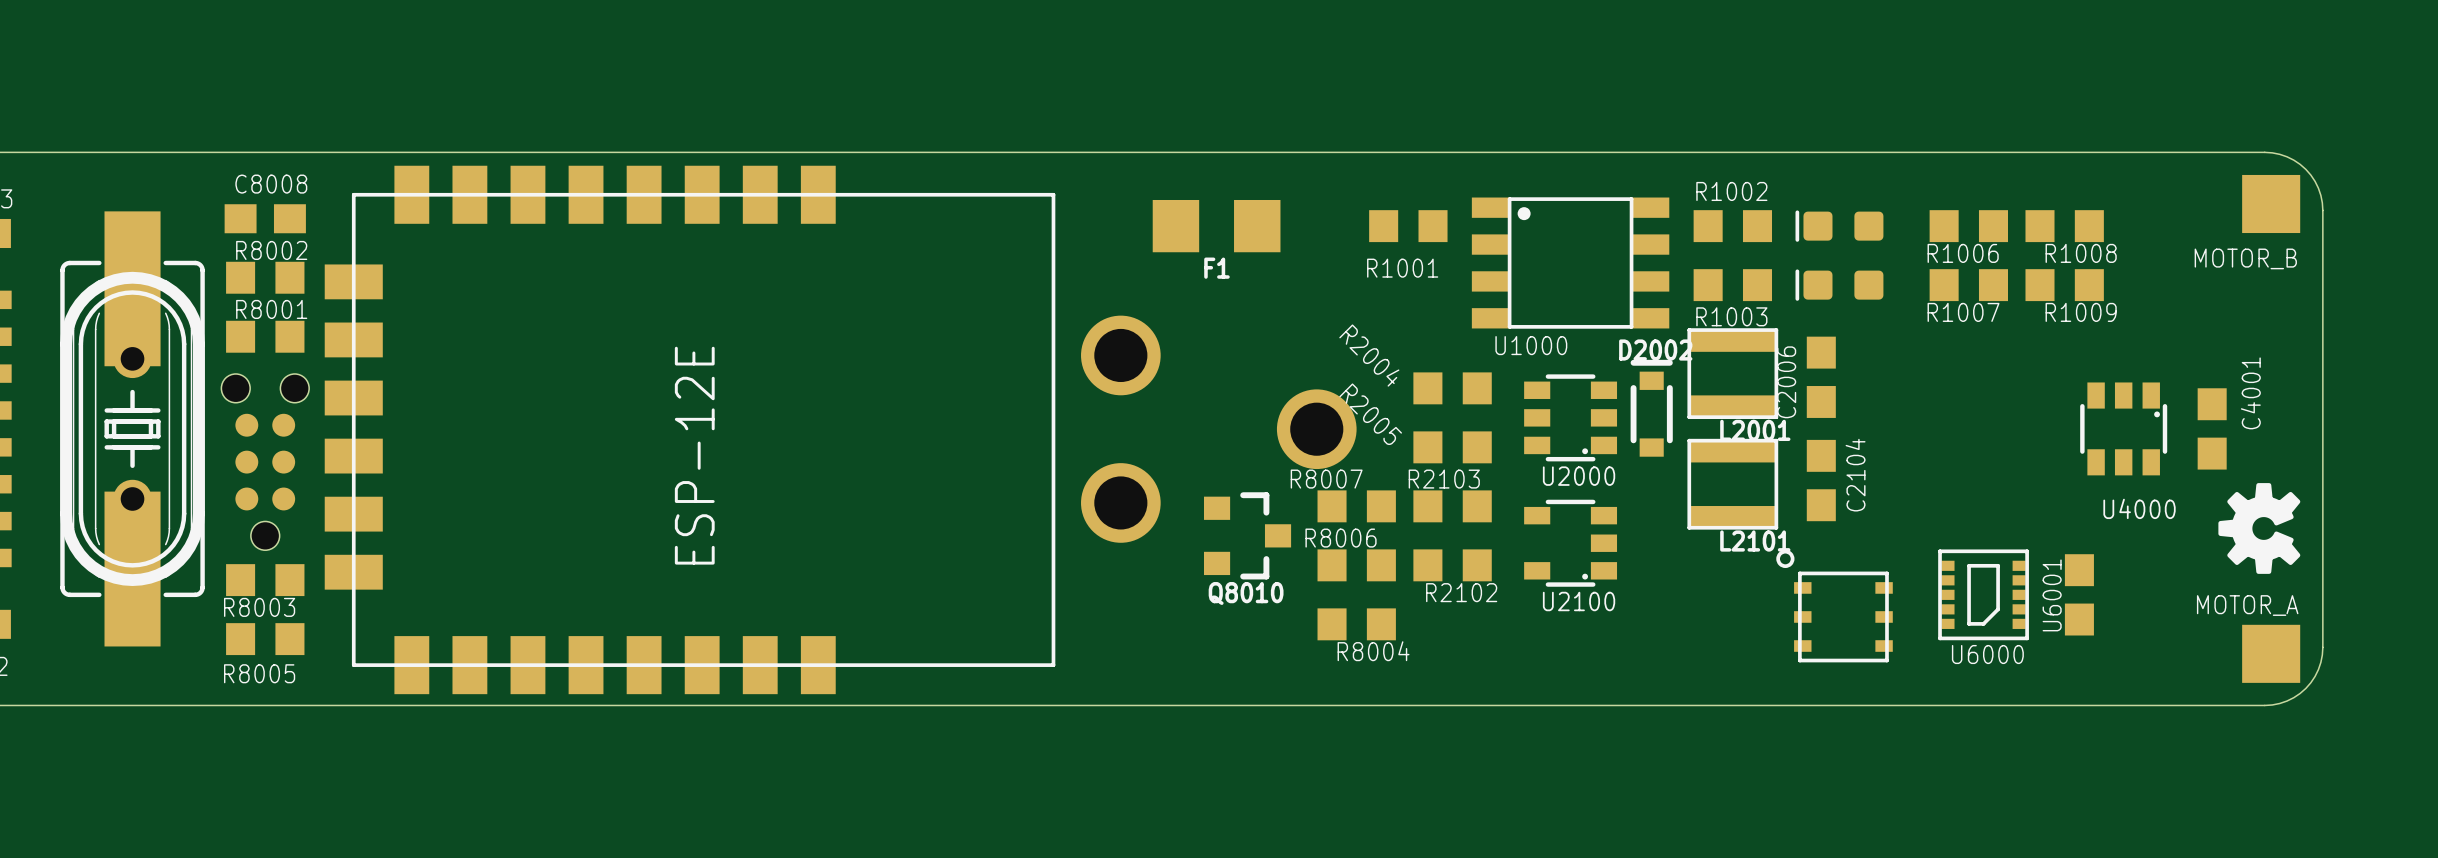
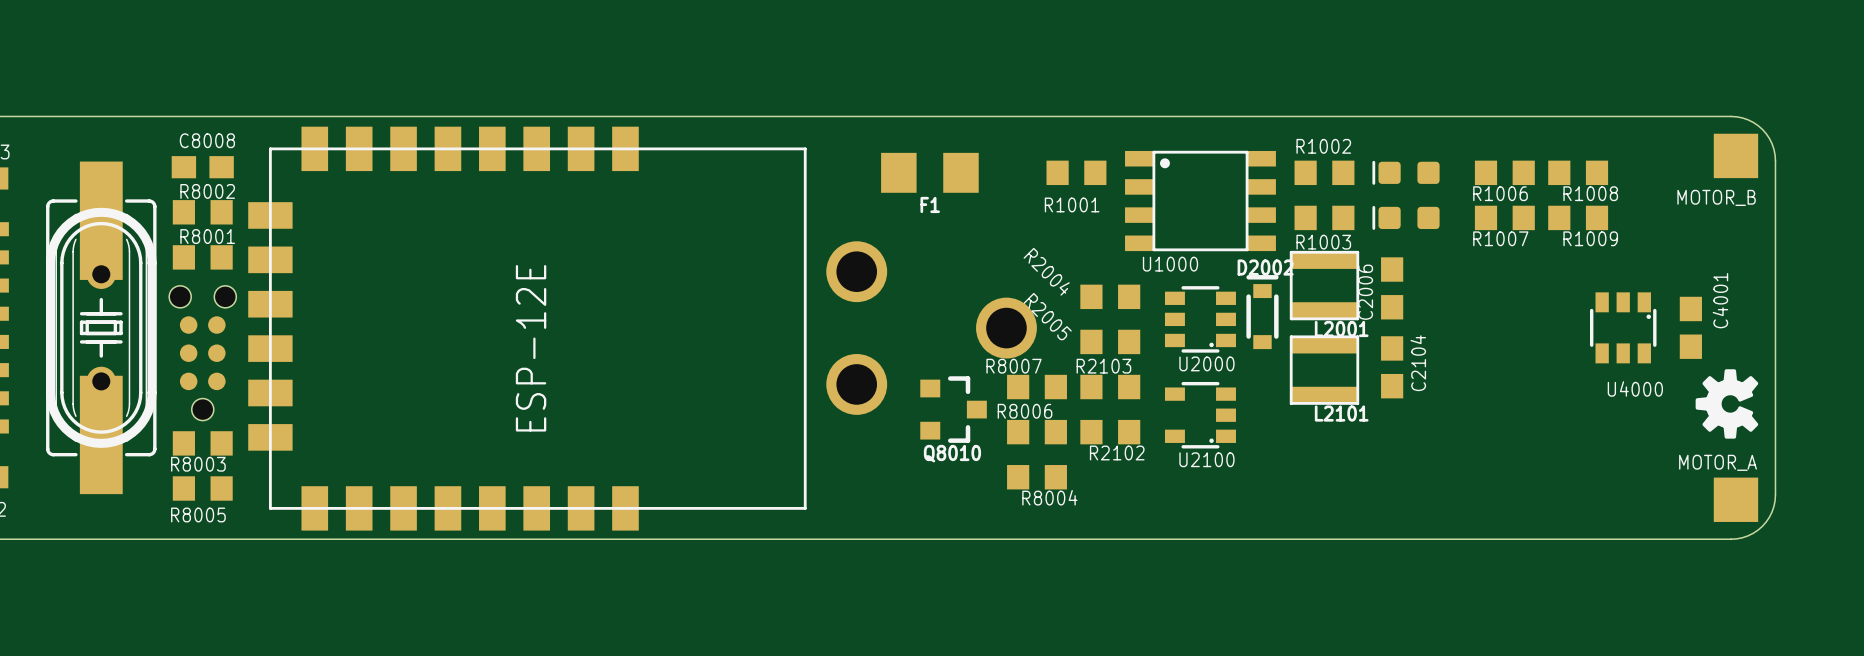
U6000: (1983, 594) -> none
U6001: (2079, 594) -> none
part: (1834, 606) -> none

